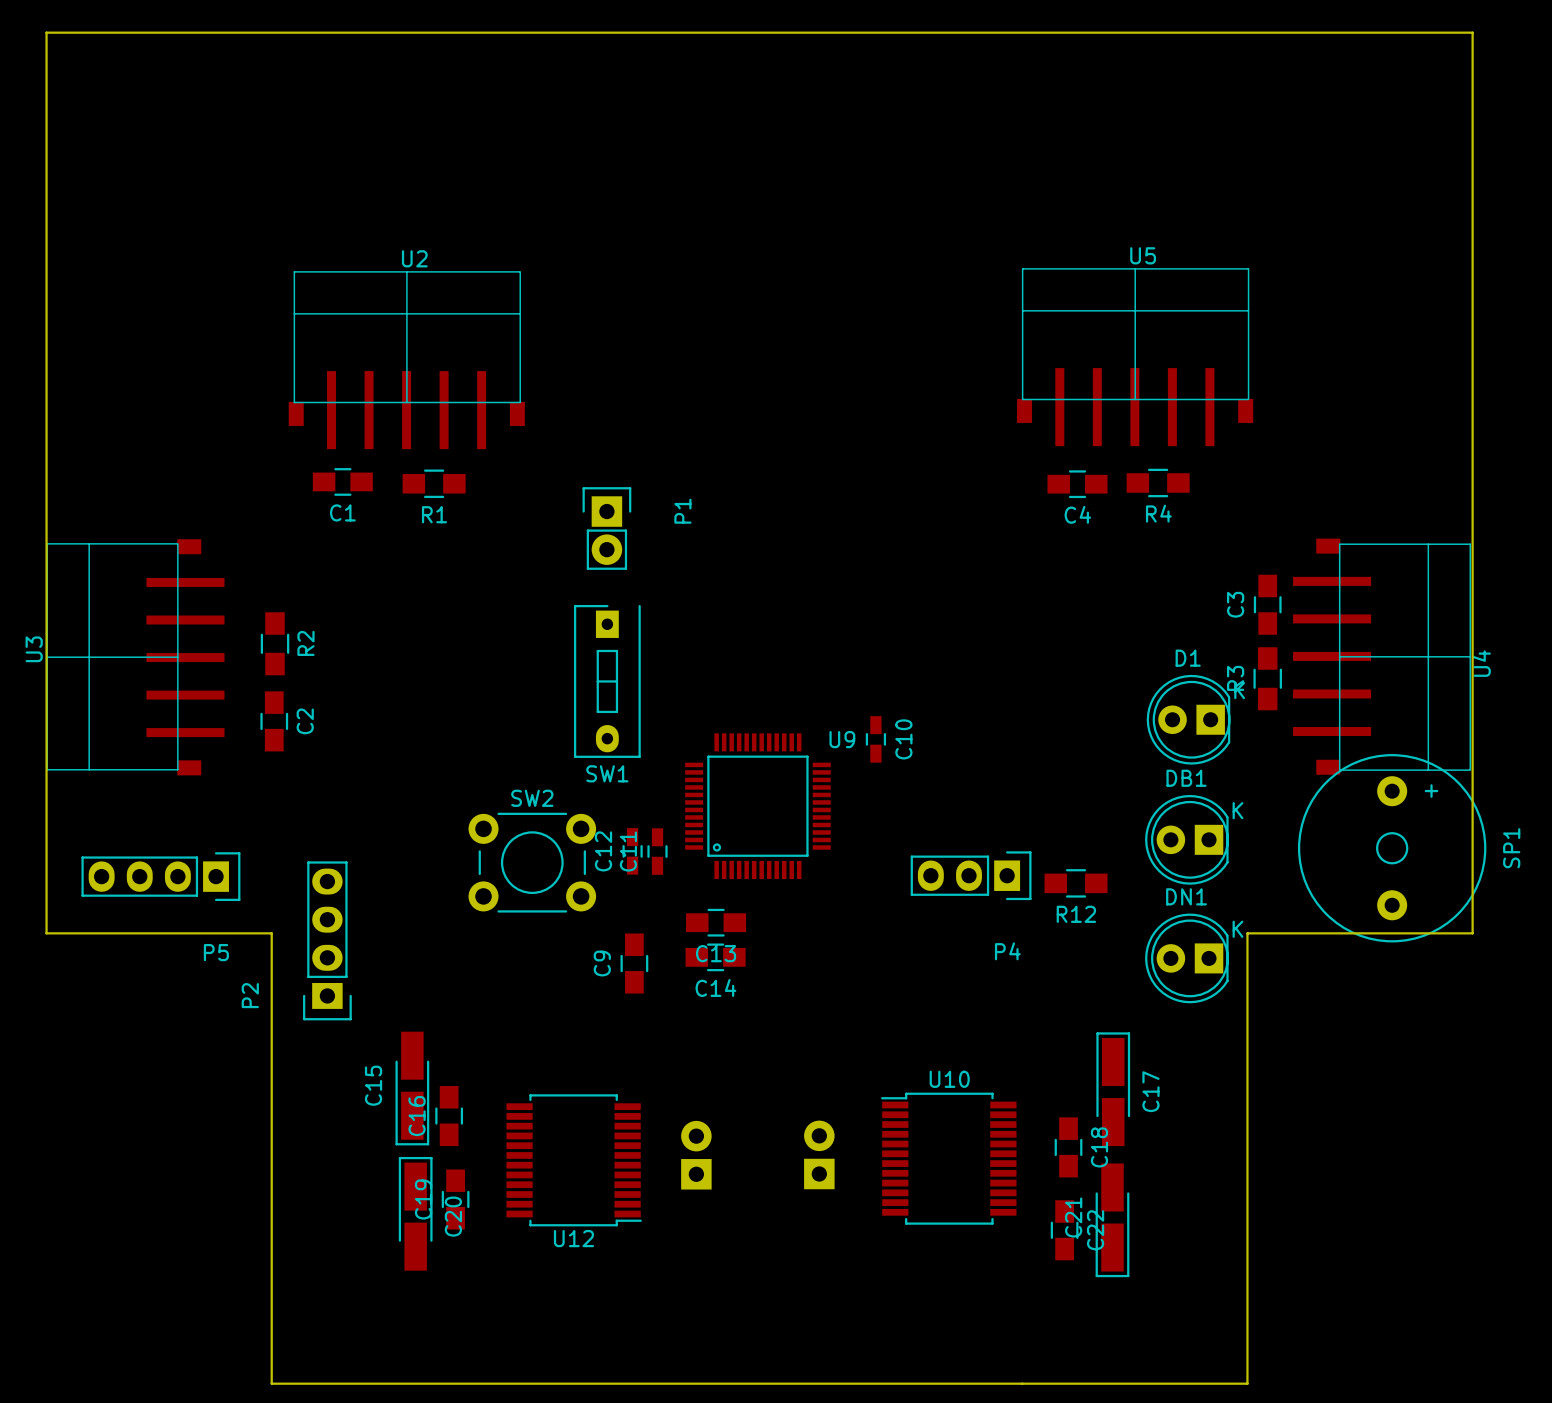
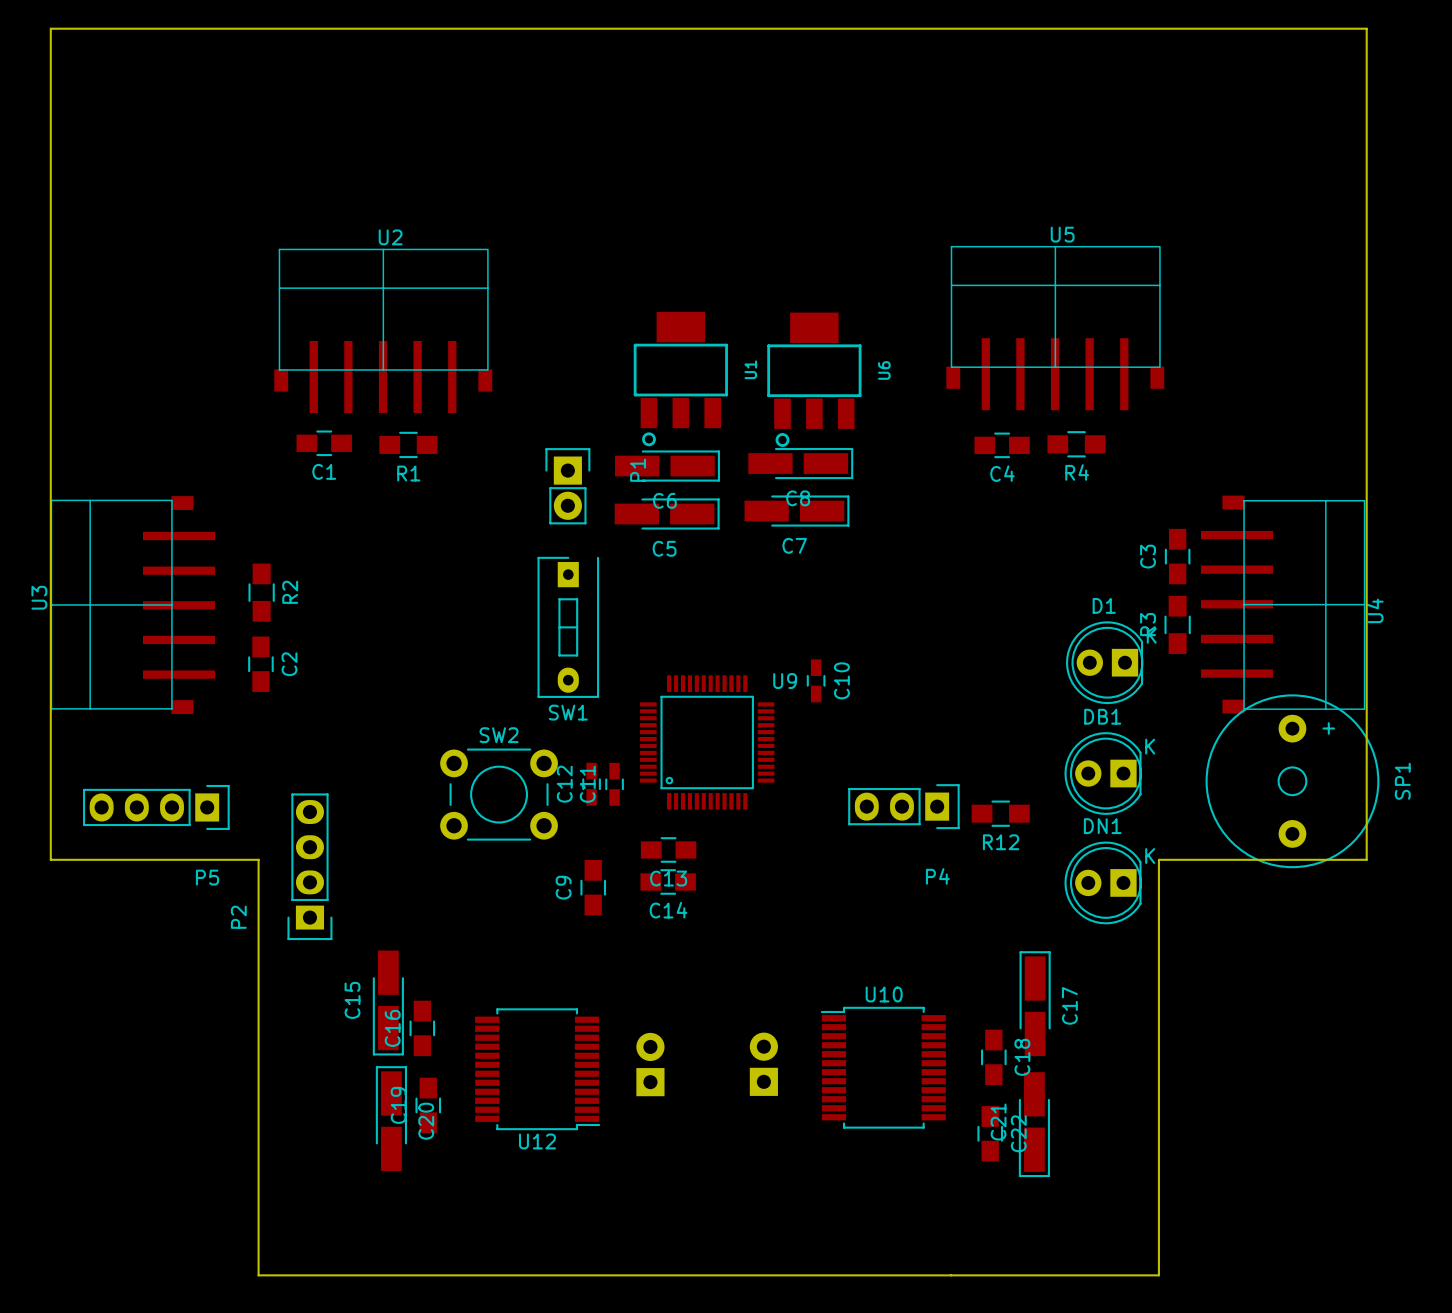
U1: none -> (680, 379)
U6: none -> (814, 379)
C8: none -> (800, 463)
C6: none -> (667, 466)
C7: none -> (796, 511)
C5: none -> (667, 513)

